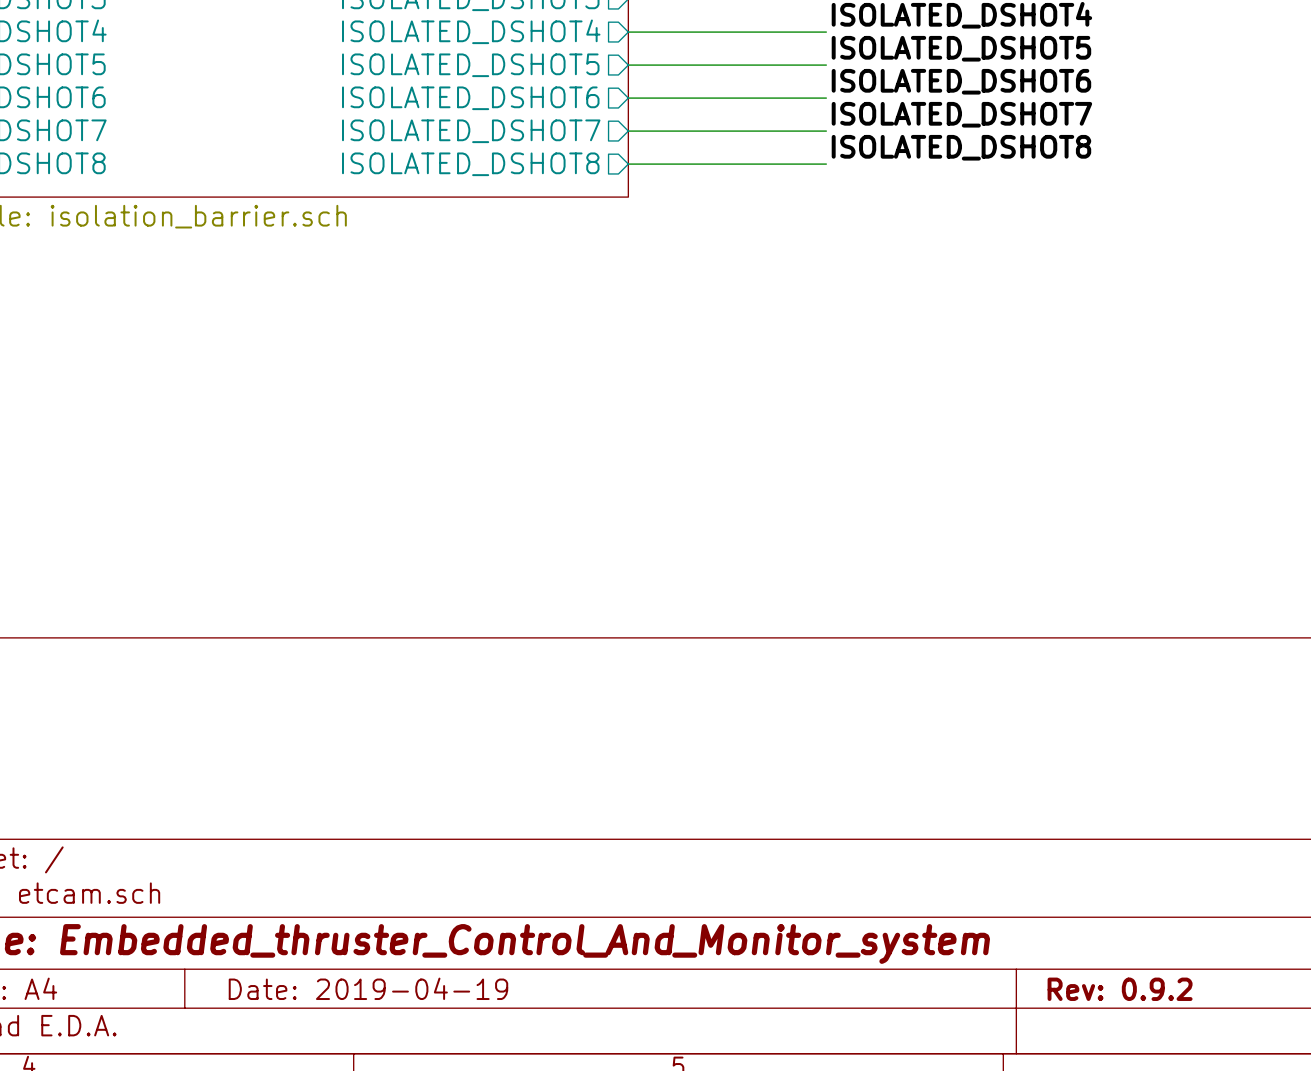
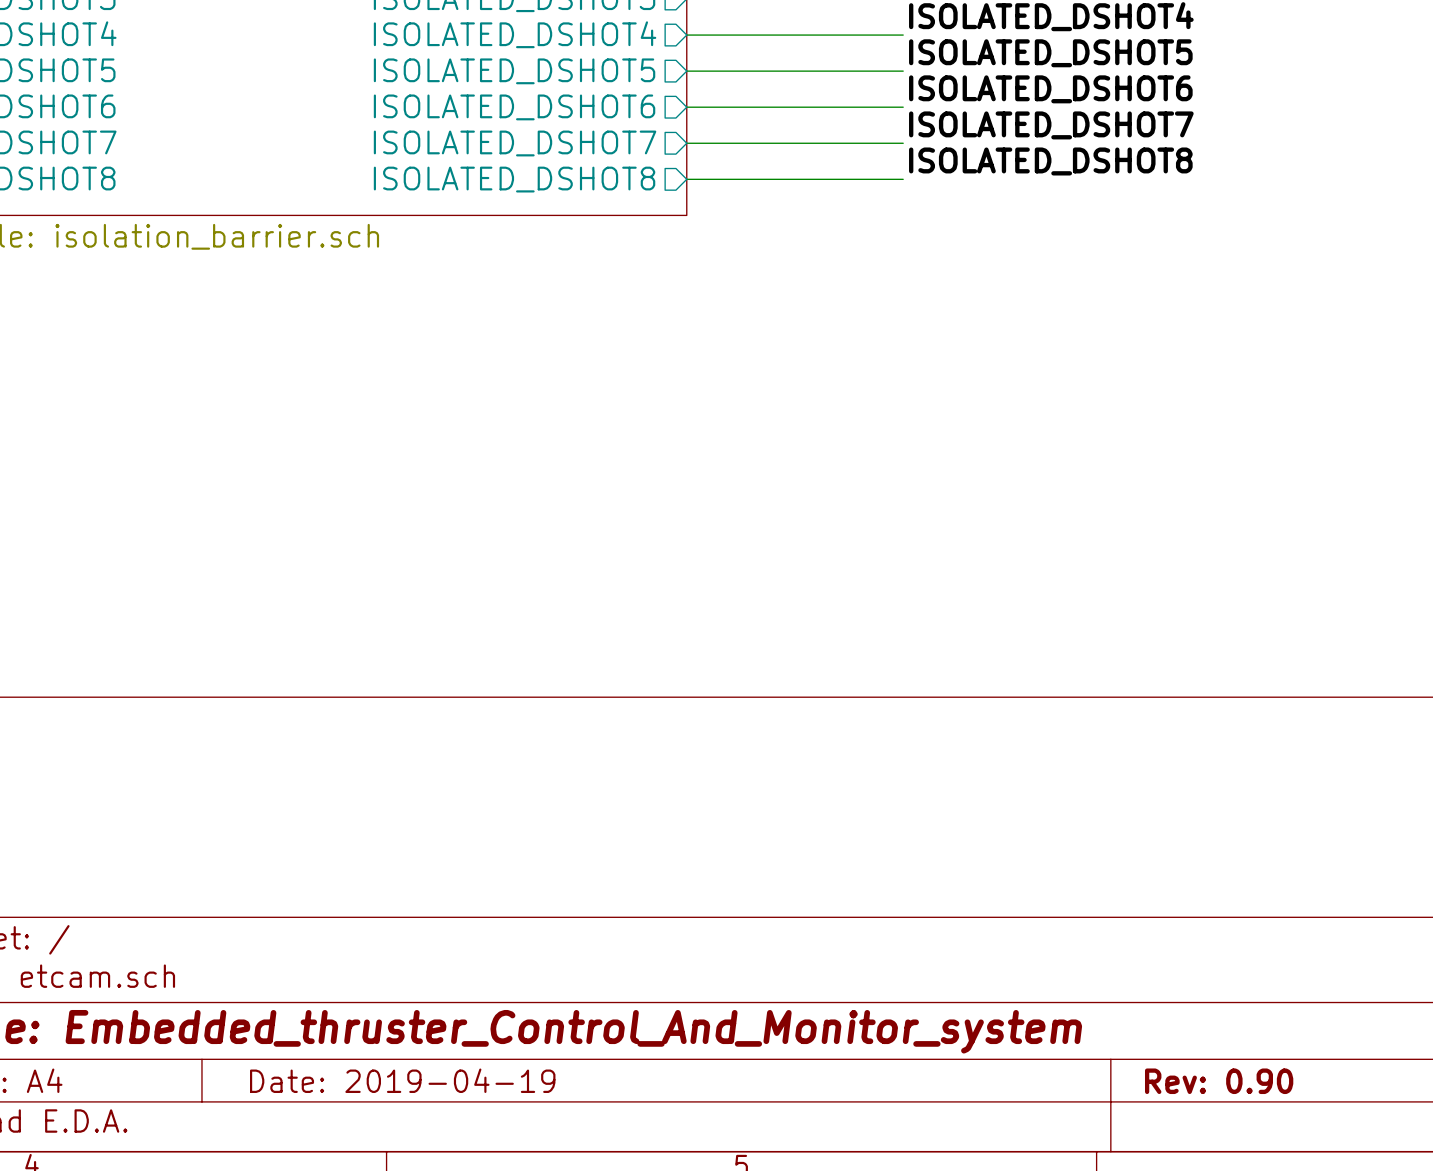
title block: Rev: 0.9.2 (1120, 989) -> Rev: 0.90 (1219, 1081)

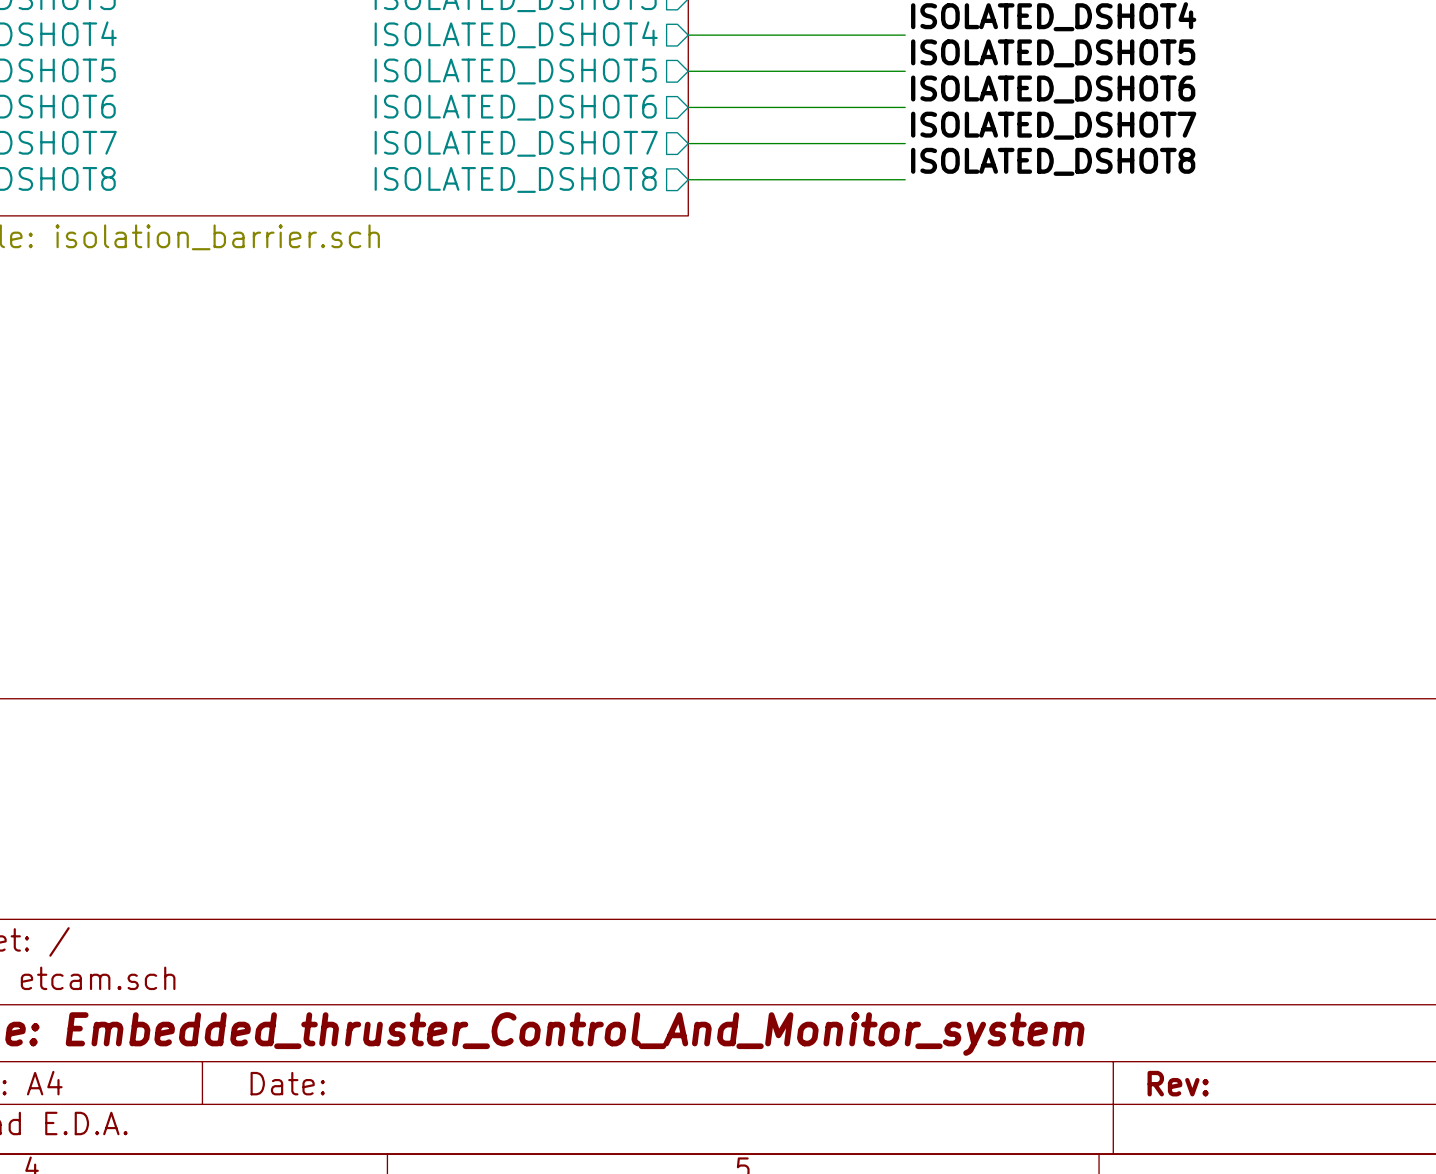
title block: Date: 2019-04-19 (402, 1080) -> Date: (287, 1083)
title block: Rev: 0.90 (1219, 1081) -> Rev: (1178, 1083)

